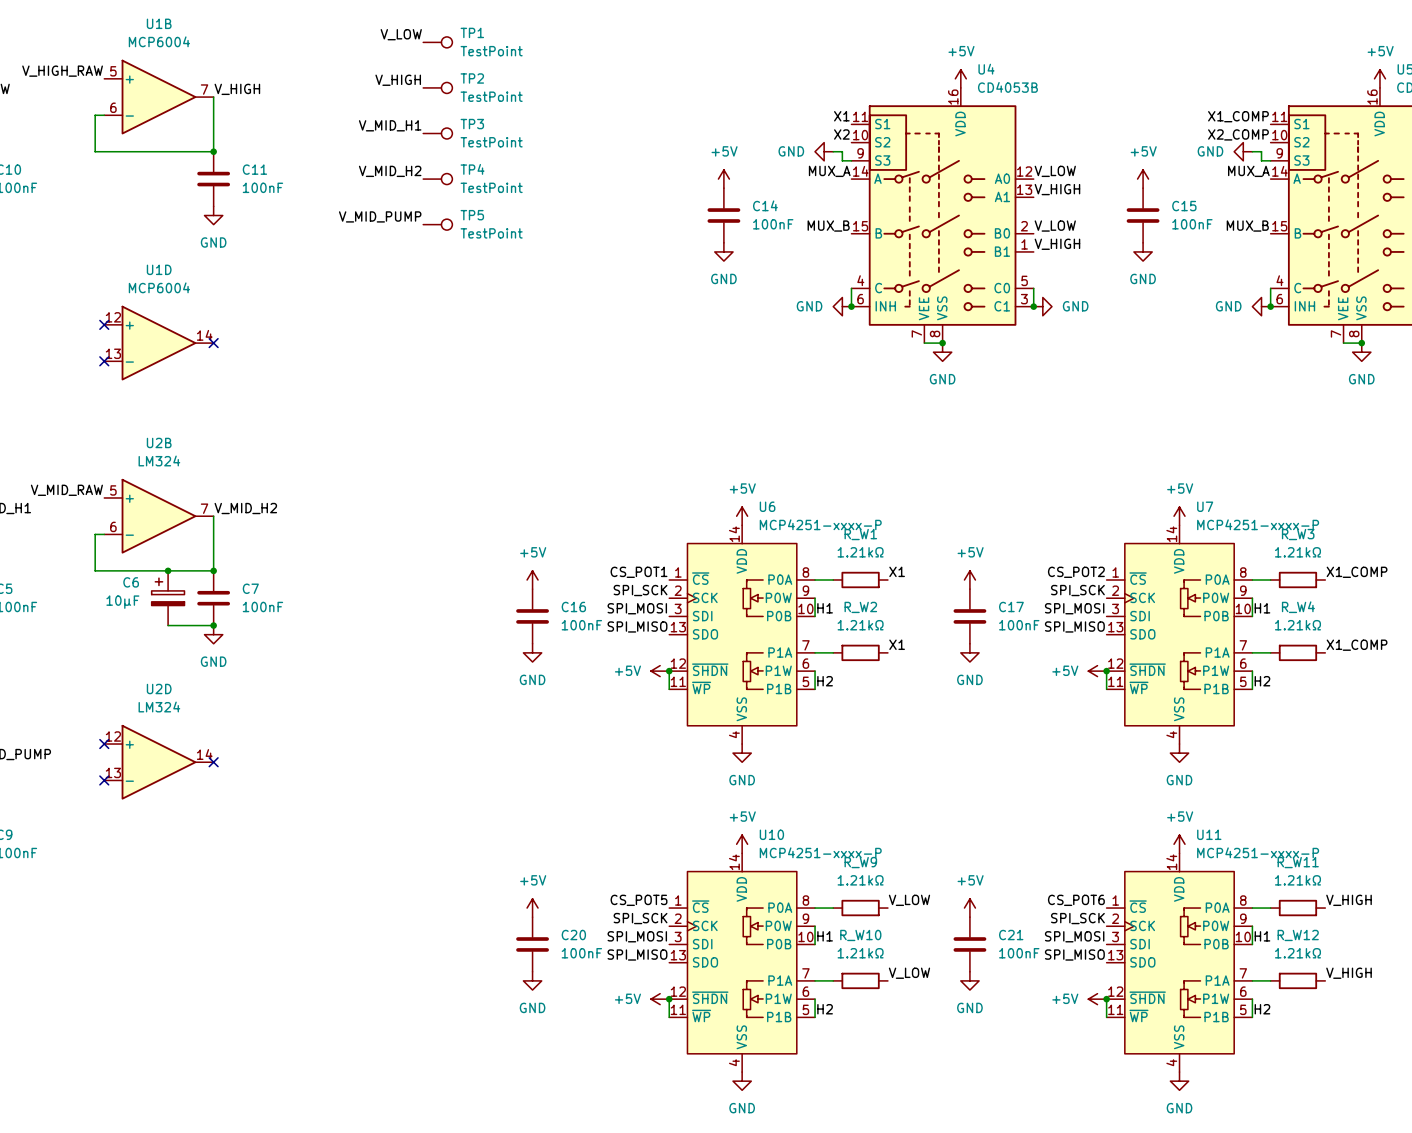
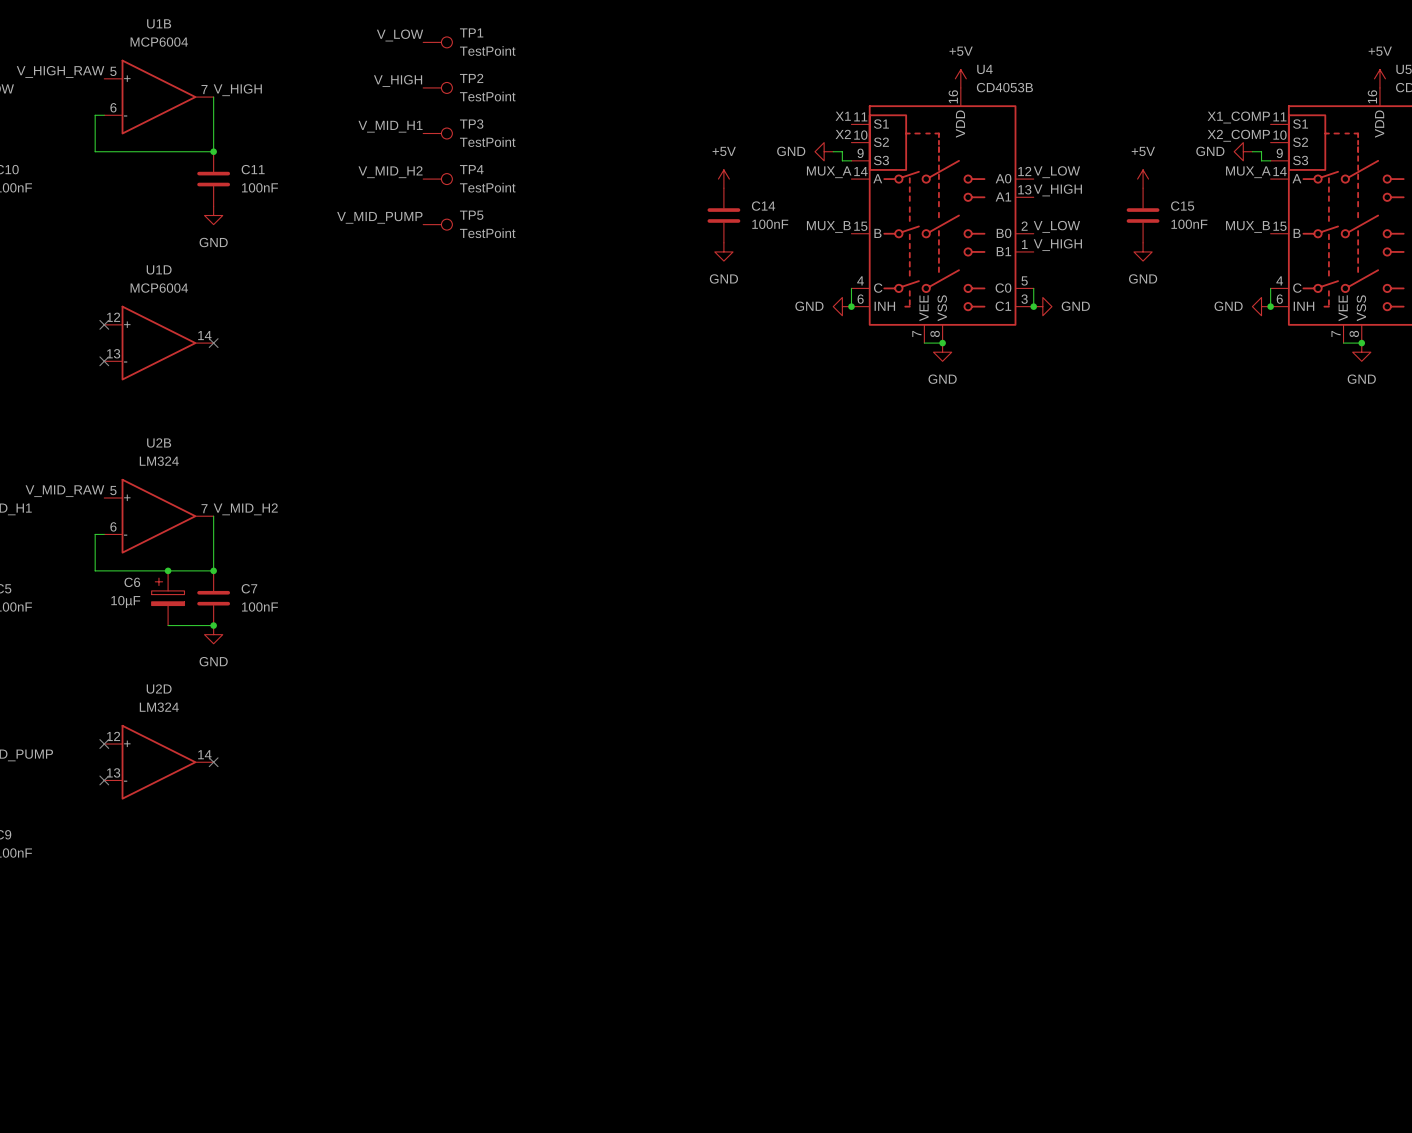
power symbol: +5V (742, 516) -> none
power symbol: +5V (1179, 516) -> none
label: X1 (897, 571) -> none
label: CS_POT1 (639, 572) -> none
label: CS_POT2 (1076, 572) -> none
label: X1_COMP (1357, 572) -> none
power symbol: +5V (532, 579) -> none
wire: (815, 579) (833, 579) -> none
R_W1: 1.21kΩ (860, 579) -> none
power symbol: +5V (969, 579) -> none
wire: (1252, 579) (1270, 579) -> none
R_W3: 1.21kΩ (1297, 579) -> none
label: SPI_SCK (640, 590) -> none
label: SPI_SCK (1077, 590) -> none
wire: (815, 598) (815, 616) -> none
wire: (1252, 598) (1252, 616) -> none
label: SPI_MOSI (637, 608) -> none
label: H1 (825, 608) -> none
label: SPI_MOSI (1074, 608) -> none
label: H1 (1262, 608) -> none
C16: 100nF (532, 616) -> none
C17: 100nF (969, 616) -> none
label: SPI_MISO (637, 626) -> none
label: SPI_MISO (1074, 626) -> none
U6: MCP4251-xxxx-P (742, 634) -> none
U7: MCP4251-xxxx-P (1179, 634) -> none
label: X1 (897, 644) -> none
label: X1_COMP (1357, 645) -> none
power symbol: GND (532, 652) -> none
wire: (815, 652) (833, 652) -> none
R_W2: 1.21kΩ (860, 652) -> none
power symbol: GND (969, 652) -> none
wire: (1252, 652) (1270, 652) -> none
R_W4: 1.21kΩ (1297, 652) -> none
power symbol: +5V (660, 671) -> none
wire: (669, 671) (669, 689) -> none
junction: (669, 671) -> none
wire: (815, 671) (815, 689) -> none
power symbol: +5V (1097, 671) -> none
wire: (1106, 671) (1106, 689) -> none
junction: (1106, 671) -> none
wire: (1252, 671) (1252, 689) -> none
label: H2 (825, 681) -> none
label: H2 (1262, 681) -> none
power symbol: GND (742, 753) -> none
power symbol: GND (1179, 753) -> none
power symbol: +5V (742, 844) -> none
power symbol: +5V (1179, 844) -> none
label: CS_POT5 (639, 900) -> none
label: V_LOW (909, 900) -> none
label: CS_POT6 (1076, 900) -> none
label: V_HIGH (1349, 900) -> none
power symbol: +5V (532, 908) -> none
wire: (815, 908) (833, 908) -> none
R_W9: 1.21kΩ (860, 908) -> none
power symbol: +5V (969, 908) -> none
wire: (1252, 908) (1270, 908) -> none
R_W11: 1.21kΩ (1297, 908) -> none
label: SPI_SCK (640, 918) -> none
label: SPI_SCK (1077, 918) -> none
wire: (815, 926) (815, 944) -> none
wire: (1252, 926) (1252, 944) -> none
label: SPI_MOSI (637, 936) -> none
label: H1 (825, 936) -> none
label: SPI_MOSI (1074, 936) -> none
label: H1 (1262, 936) -> none
C20: 100nF (532, 944) -> none
C21: 100nF (969, 944) -> none
label: SPI_MISO (637, 955) -> none
label: SPI_MISO (1074, 955) -> none
U10: MCP4251-xxxx-P (742, 962) -> none
U11: MCP4251-xxxx-P (1179, 962) -> none
label: V_LOW (909, 973) -> none
label: V_HIGH (1349, 973) -> none
power symbol: GND (532, 980) -> none
wire: (815, 980) (833, 980) -> none
R_W10: 1.21kΩ (860, 980) -> none
power symbol: GND (969, 980) -> none
wire: (1252, 980) (1270, 980) -> none
R_W12: 1.21kΩ (1297, 980) -> none
power symbol: +5V (660, 999) -> none
wire: (669, 999) (669, 1017) -> none
junction: (669, 999) -> none
wire: (815, 999) (815, 1017) -> none
power symbol: +5V (1097, 999) -> none
wire: (1106, 999) (1106, 1017) -> none
junction: (1106, 999) -> none
wire: (1252, 999) (1252, 1017) -> none
label: H2 (825, 1009) -> none
label: H2 (1262, 1009) -> none
power symbol: GND (742, 1081) -> none
power symbol: GND (1179, 1081) -> none

